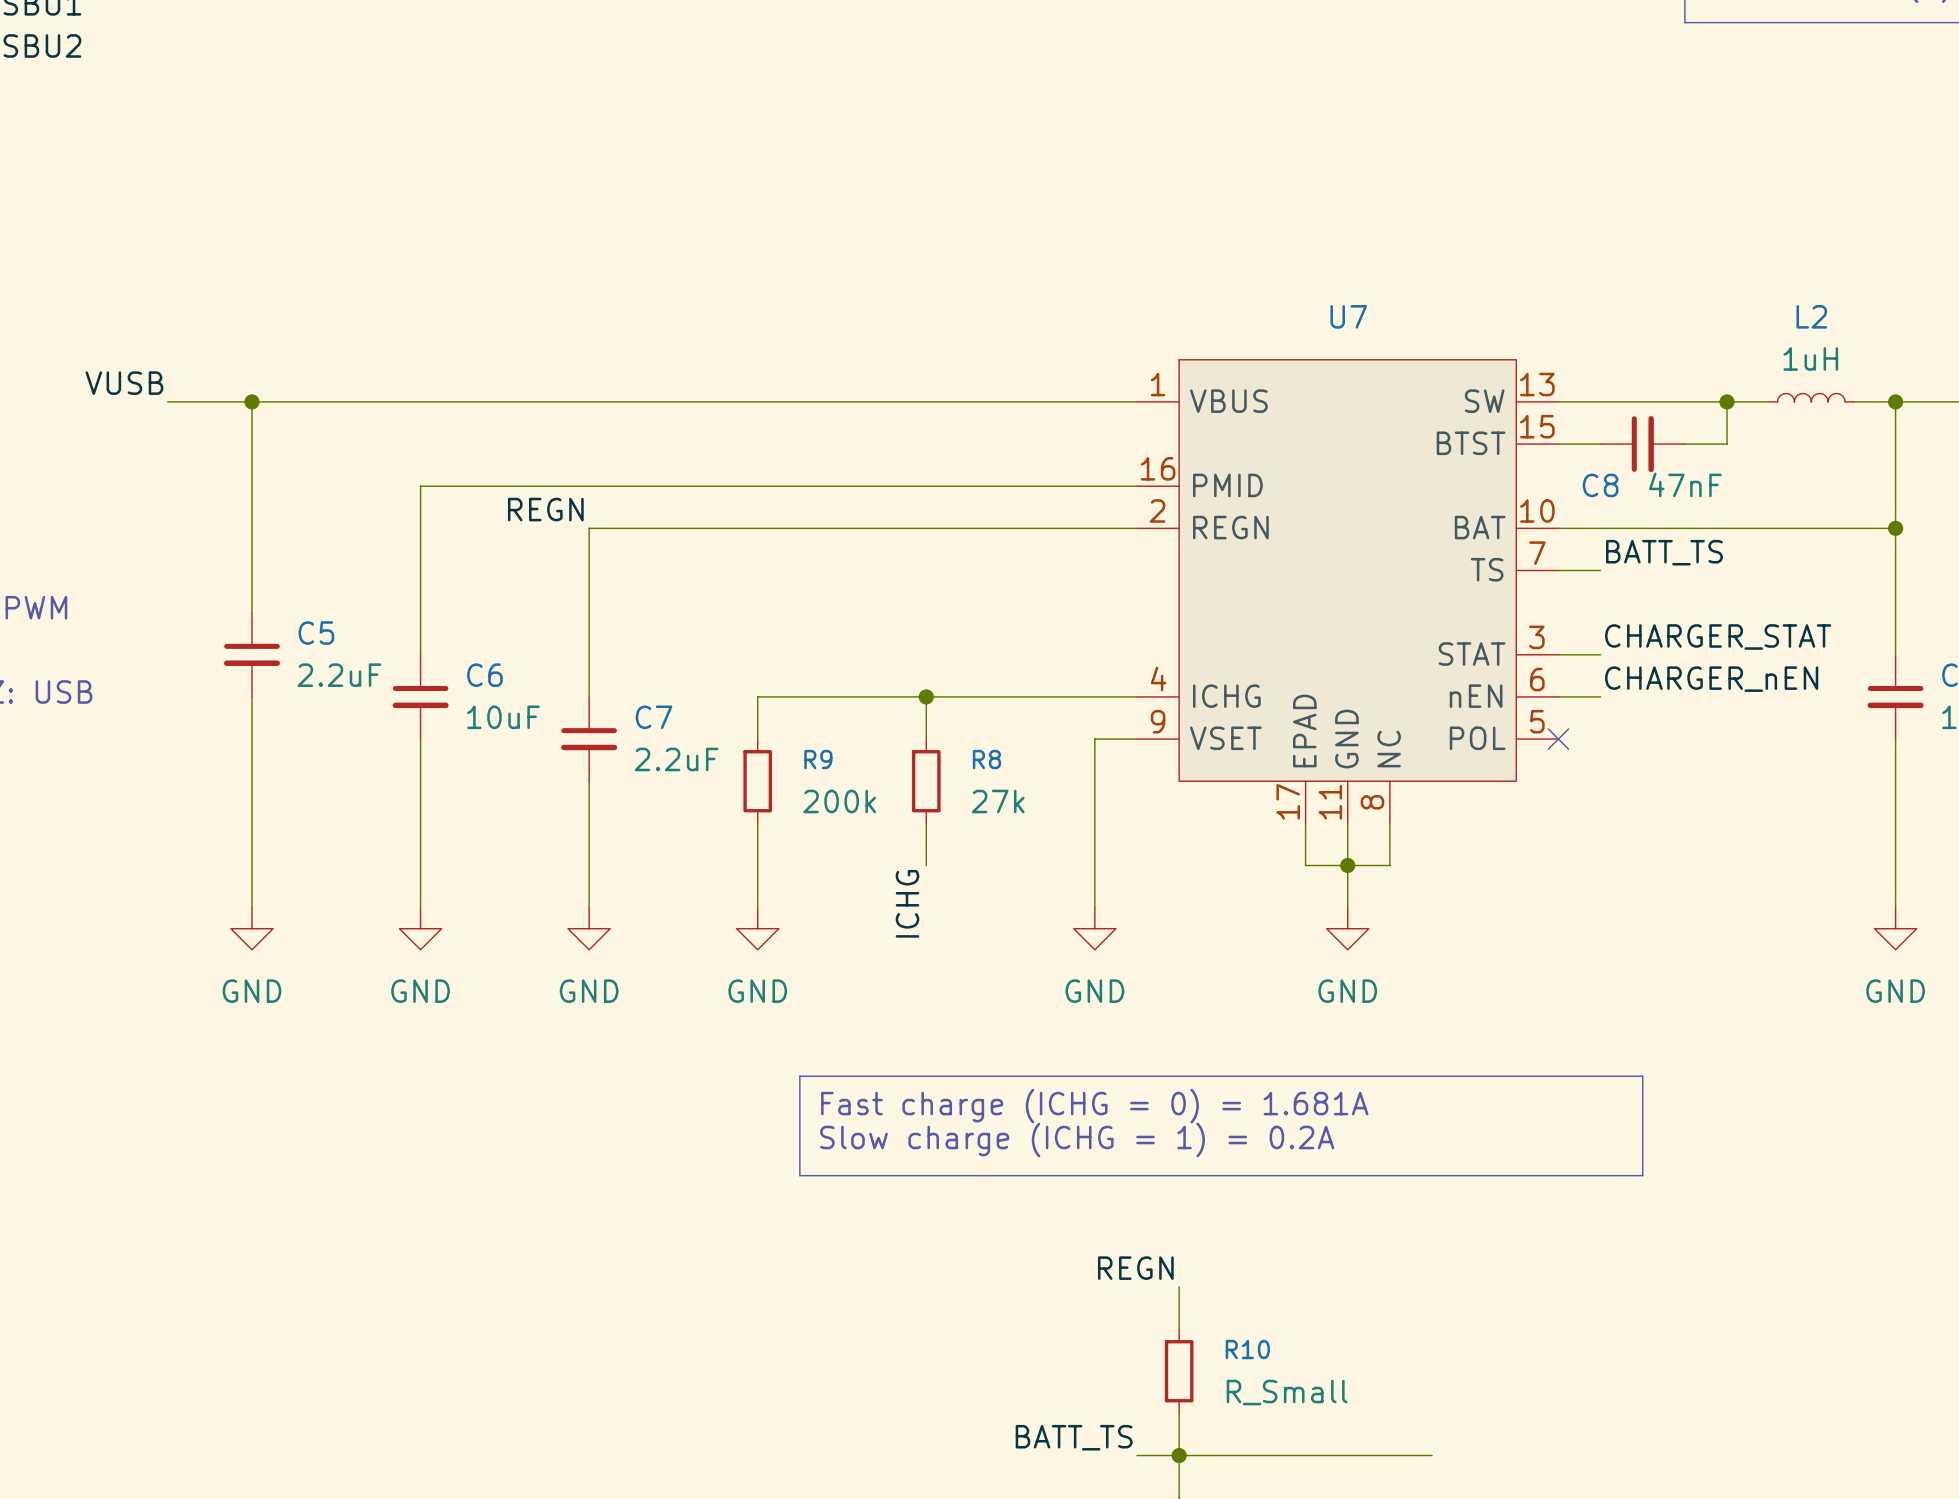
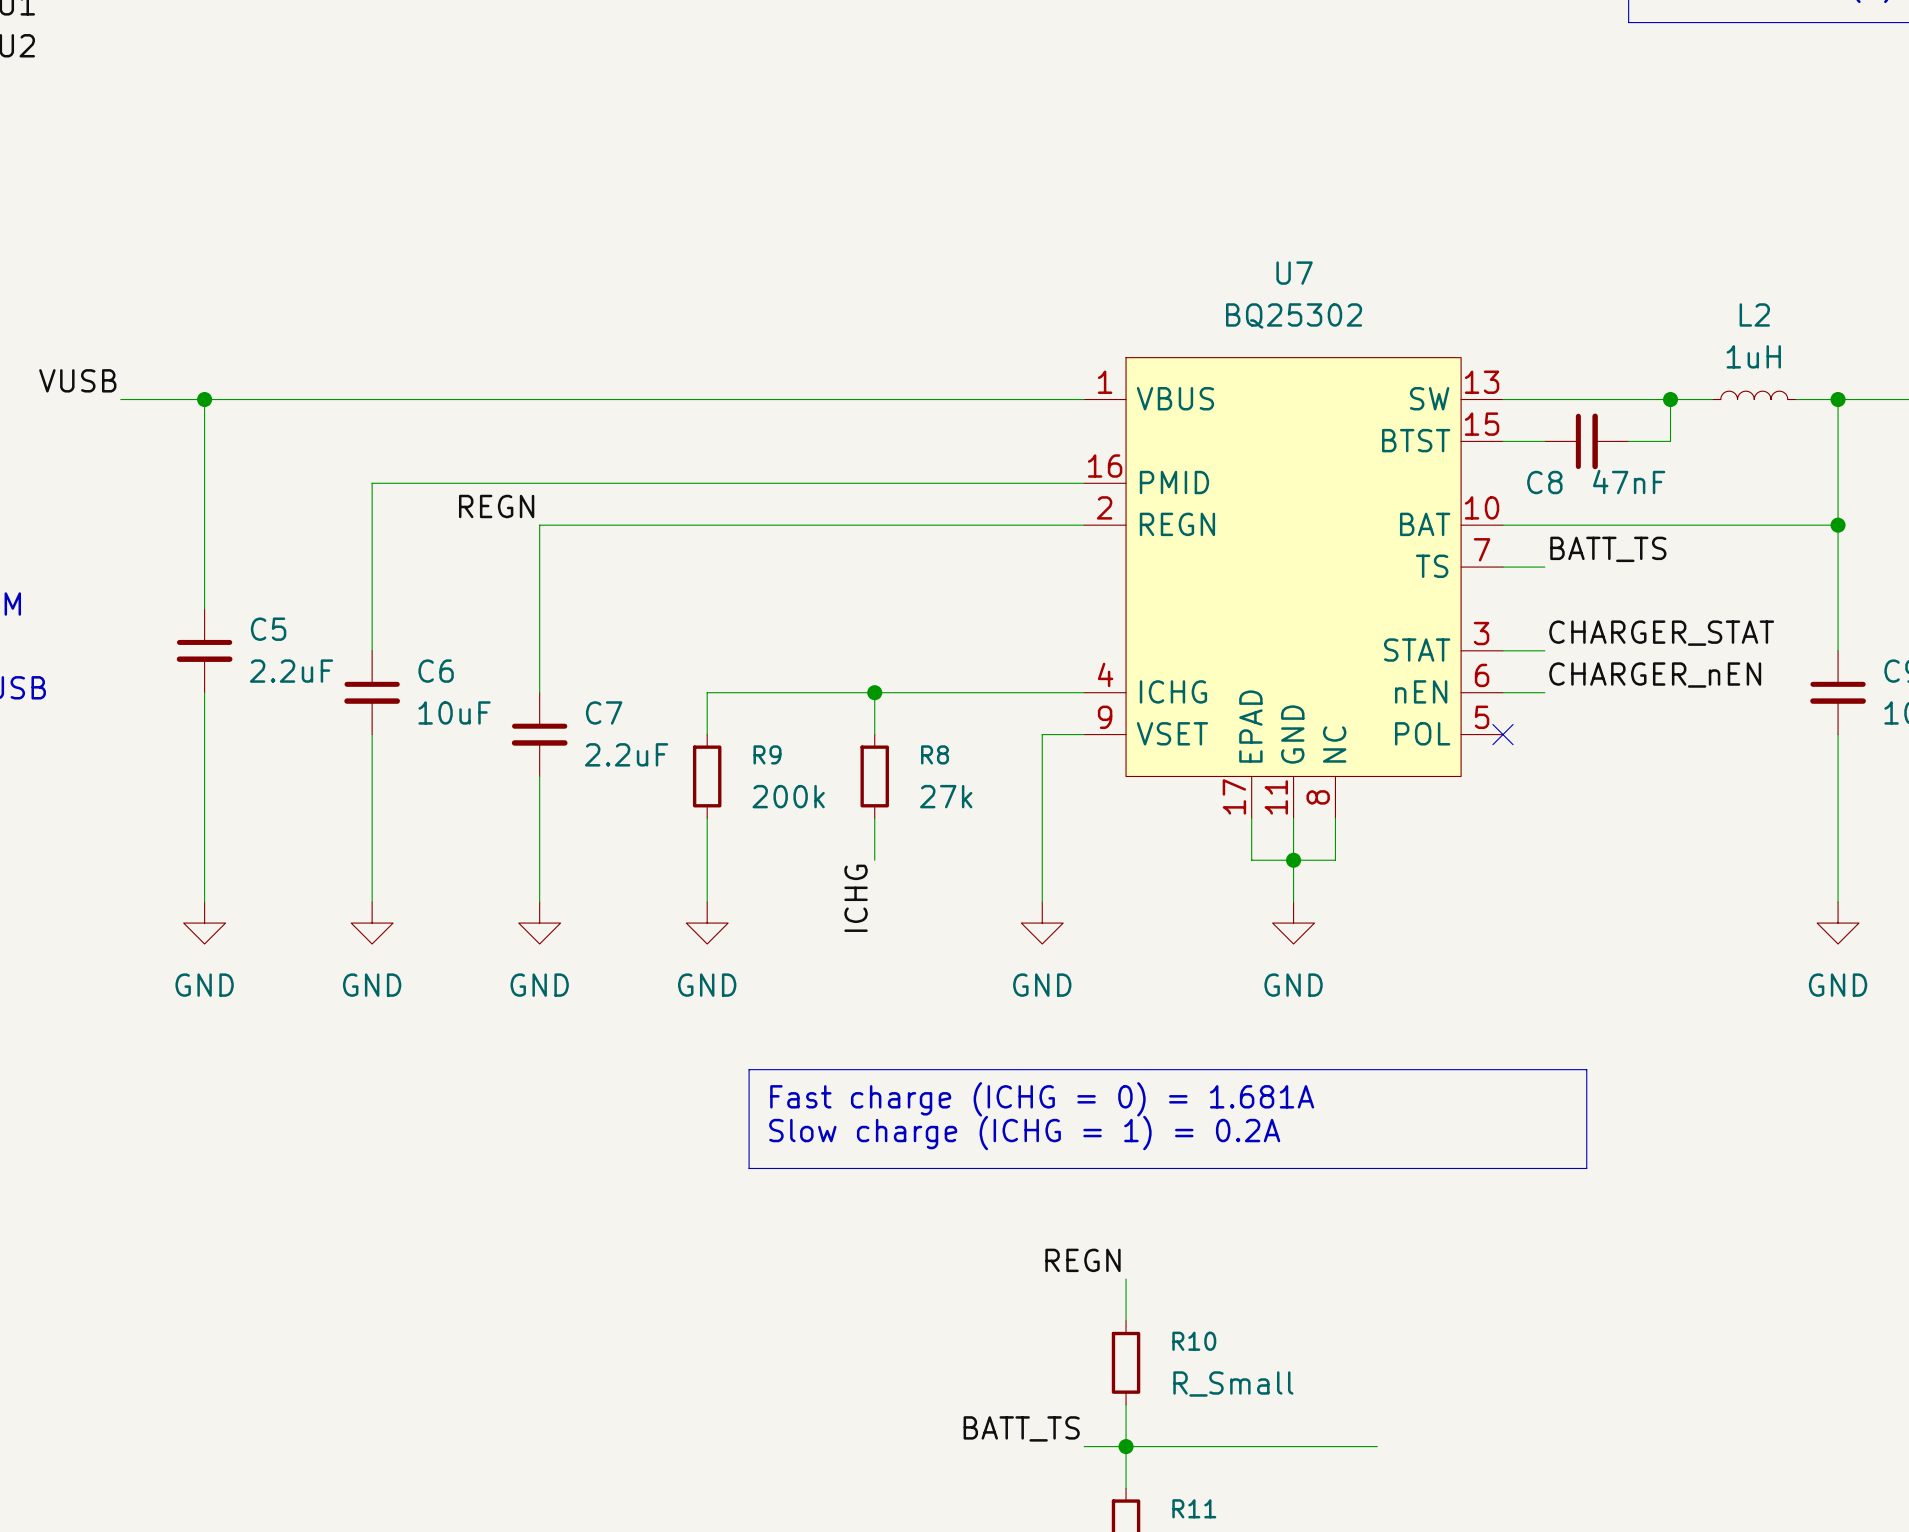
U7 name position: U7 (1348, 316) -> U7 (1294, 273)
U7 value: none -> BQ25302 (1294, 315)

